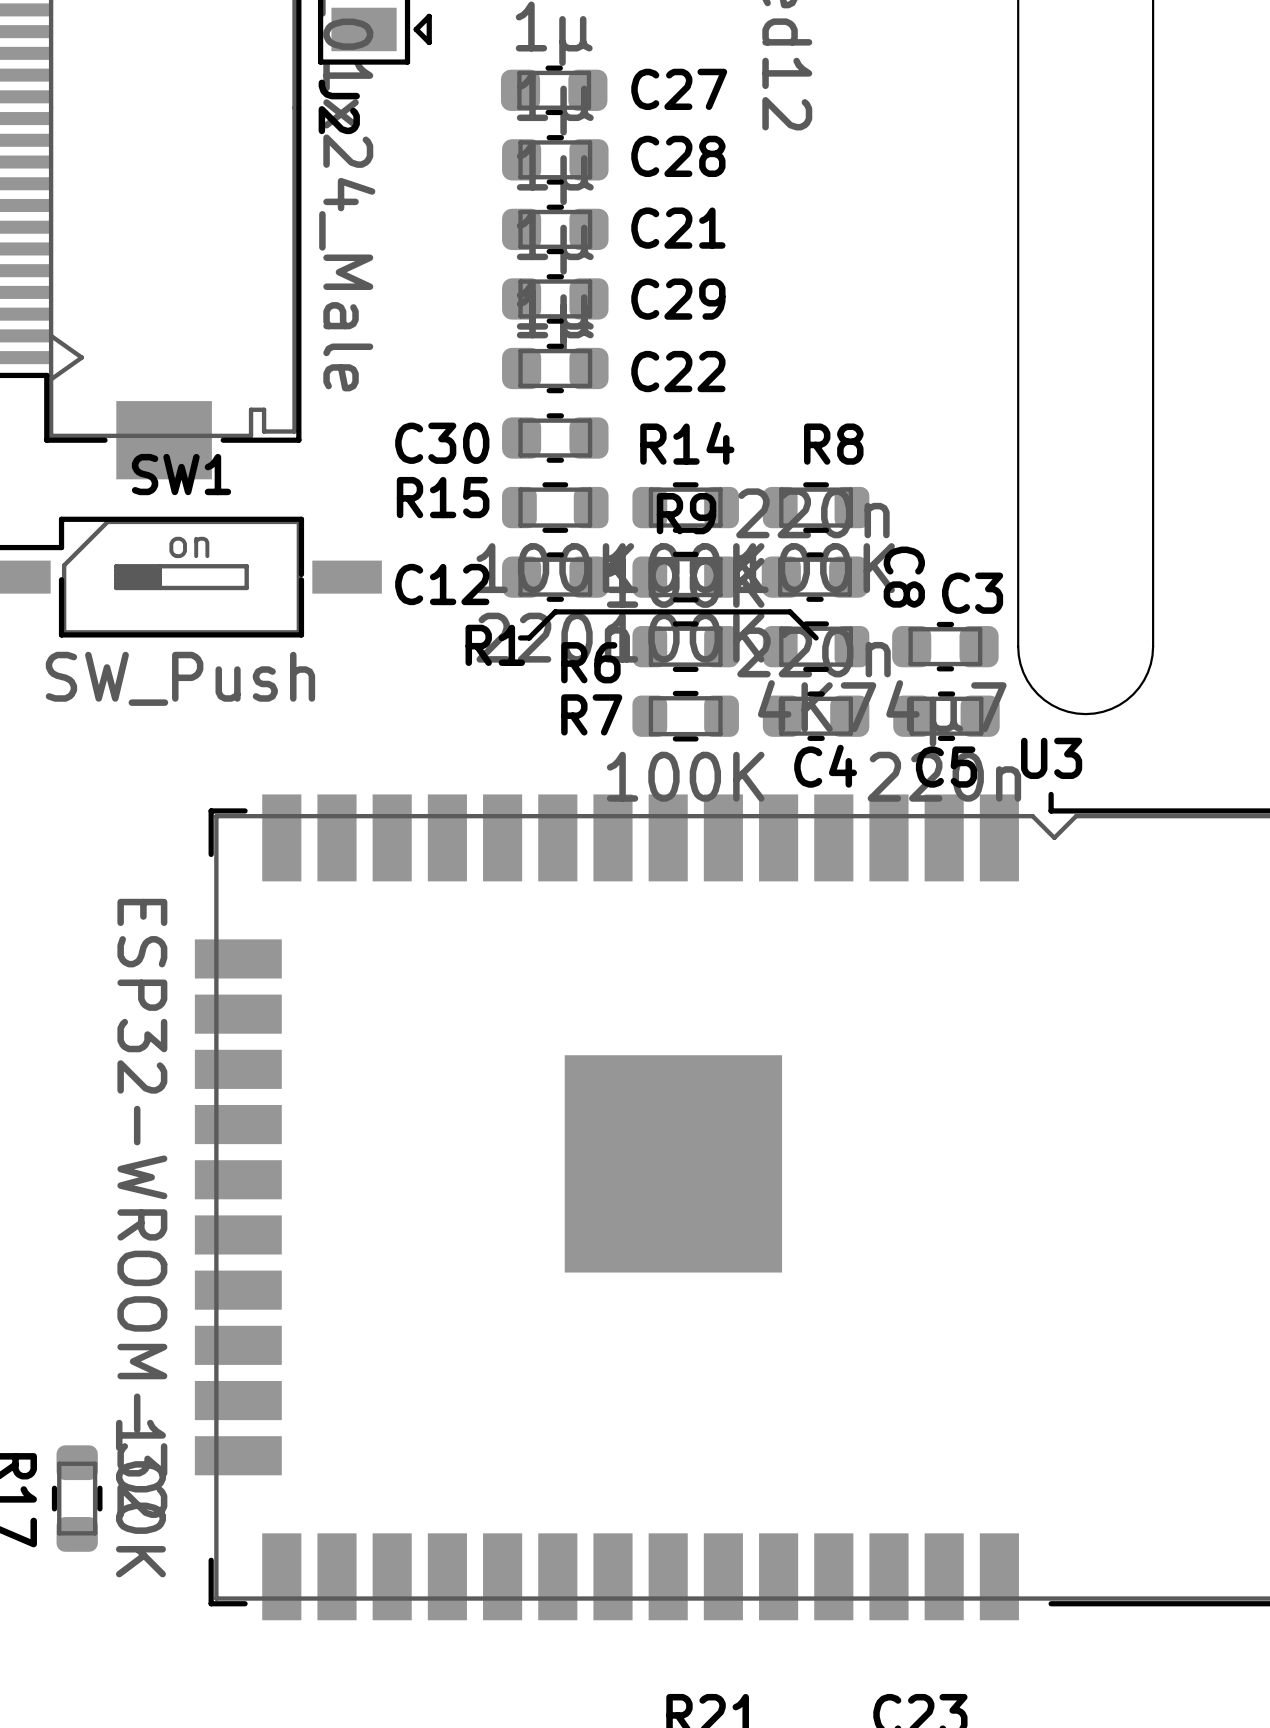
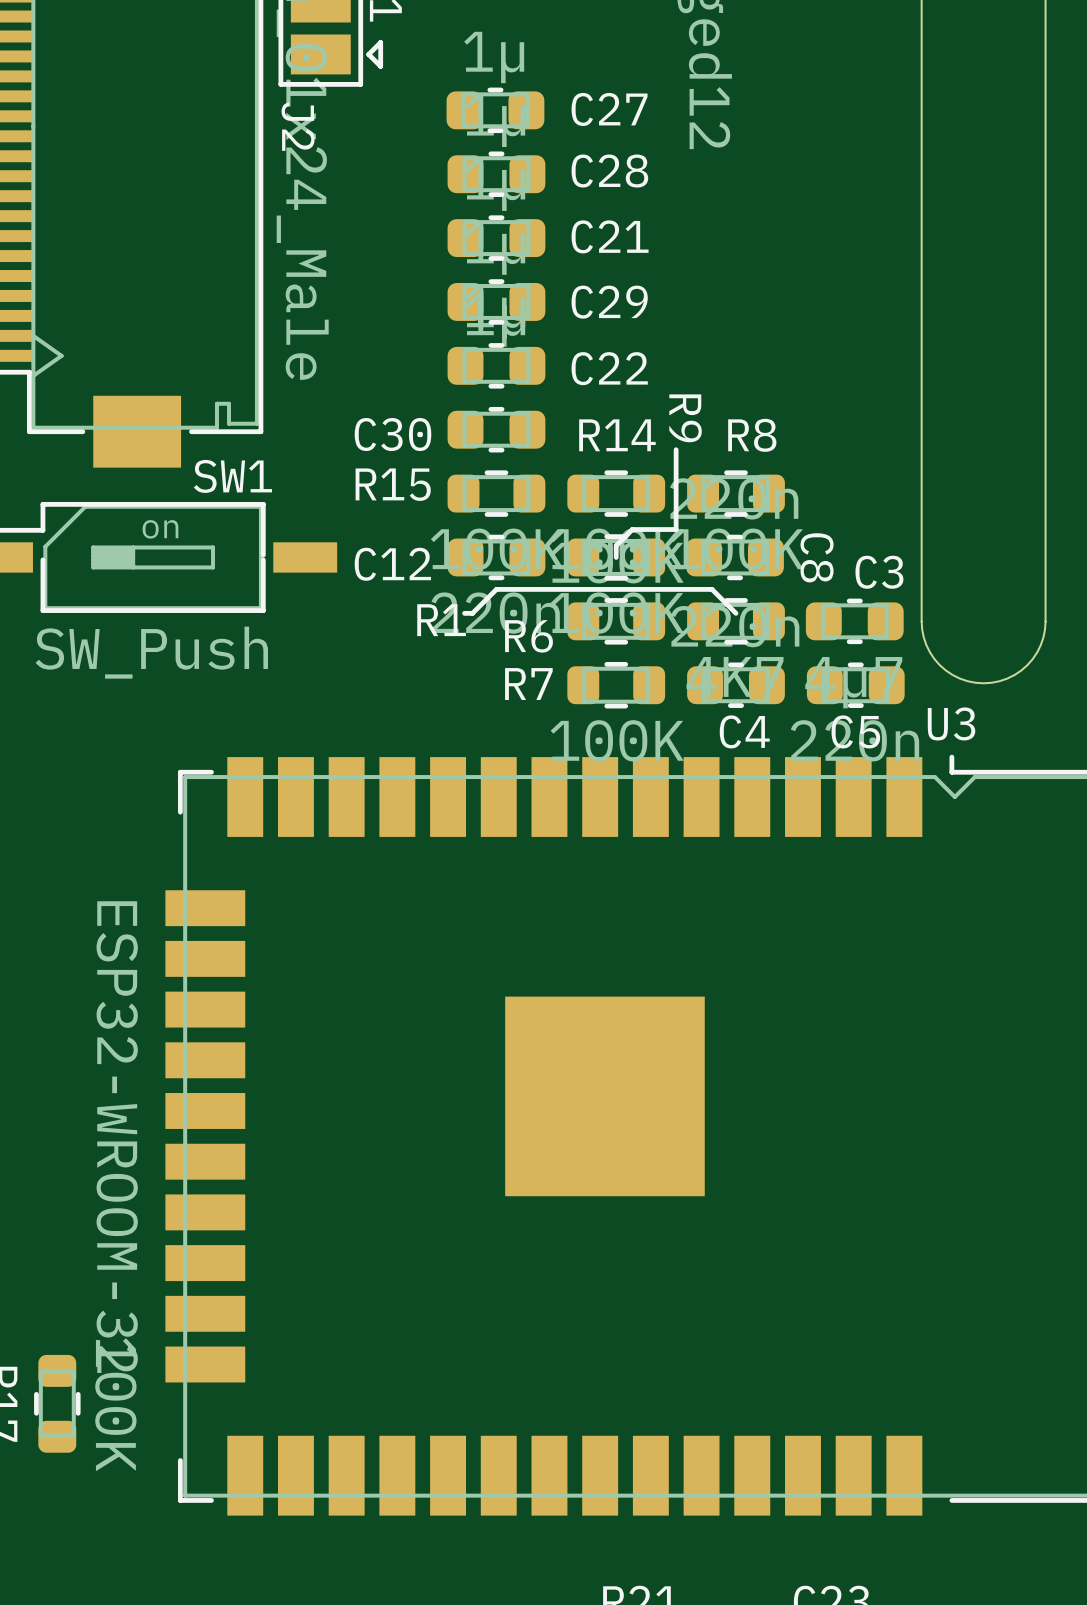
line: none -> (676, 449) (676, 529) (632, 529) (616, 545) (616, 557)
SW1 name position: SW1 (181, 474) -> SW1 (232, 476)
R9 name rotation: 0° (686, 513) -> 90° clockwise (685, 418)
R9 name position: R9 (686, 513) -> R9 (685, 418)

